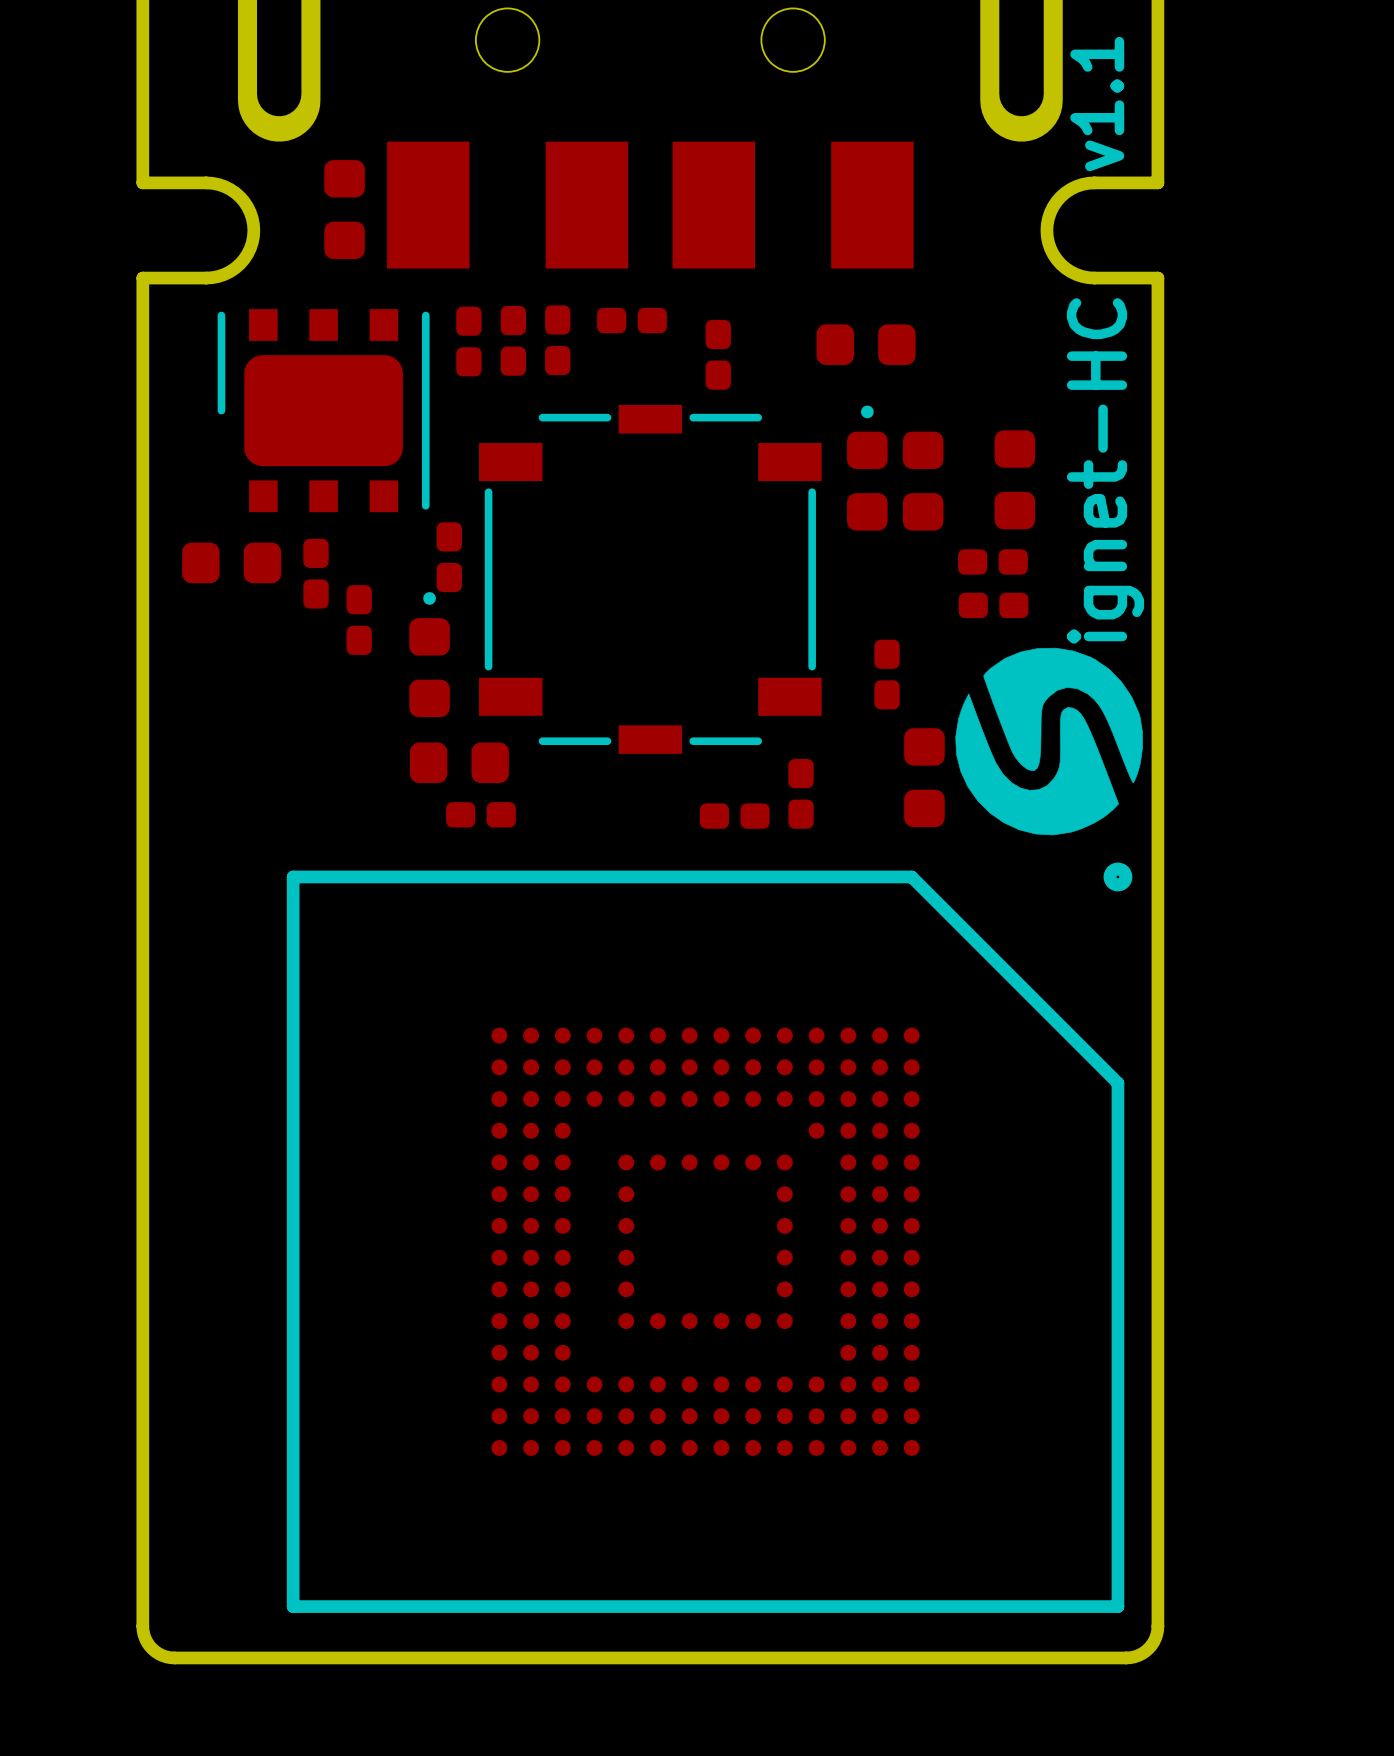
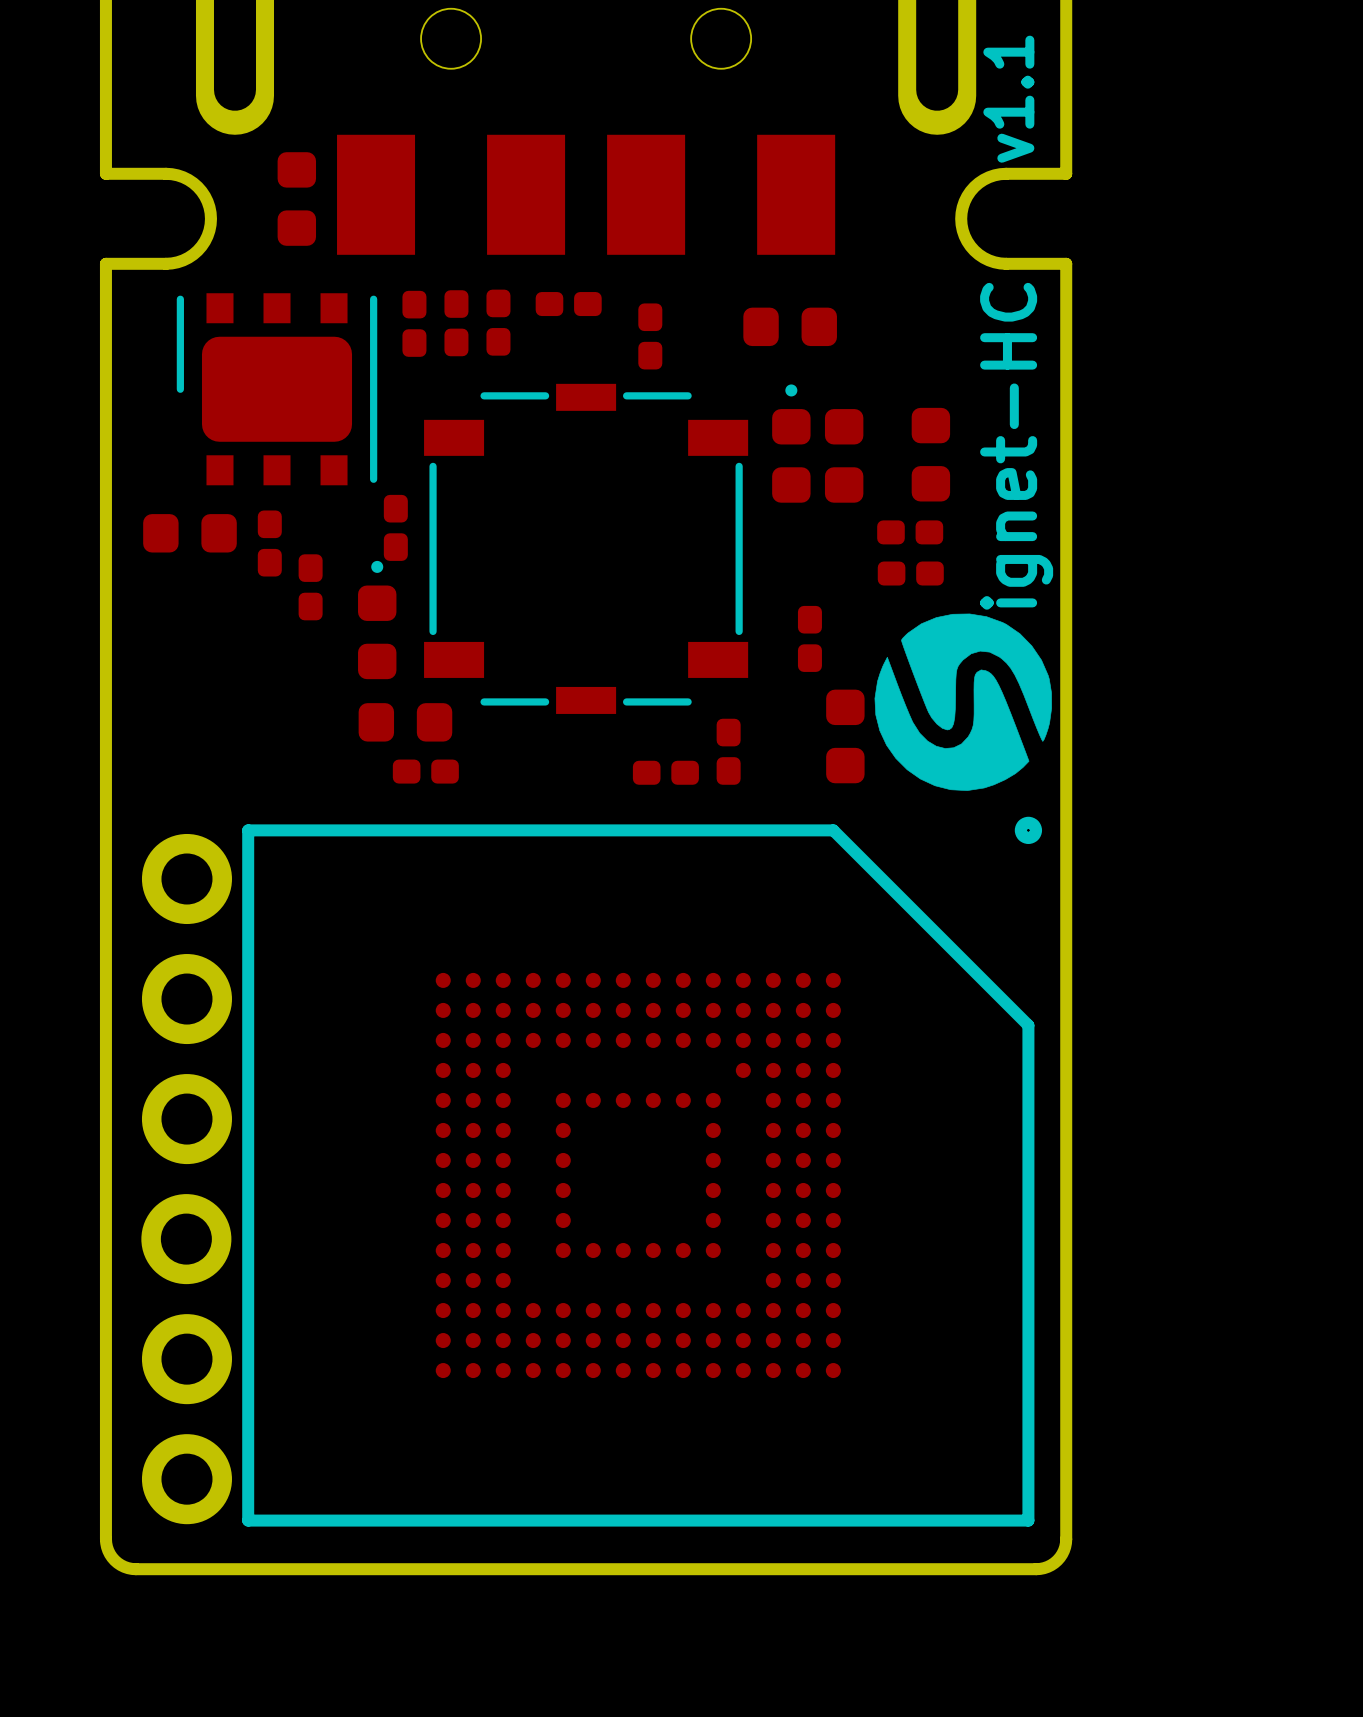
part: none -> (186, 878)
part: none -> (186, 999)
part: none -> (186, 1119)
part: none -> (186, 1239)
part: none -> (186, 1359)
part: none -> (186, 1479)

